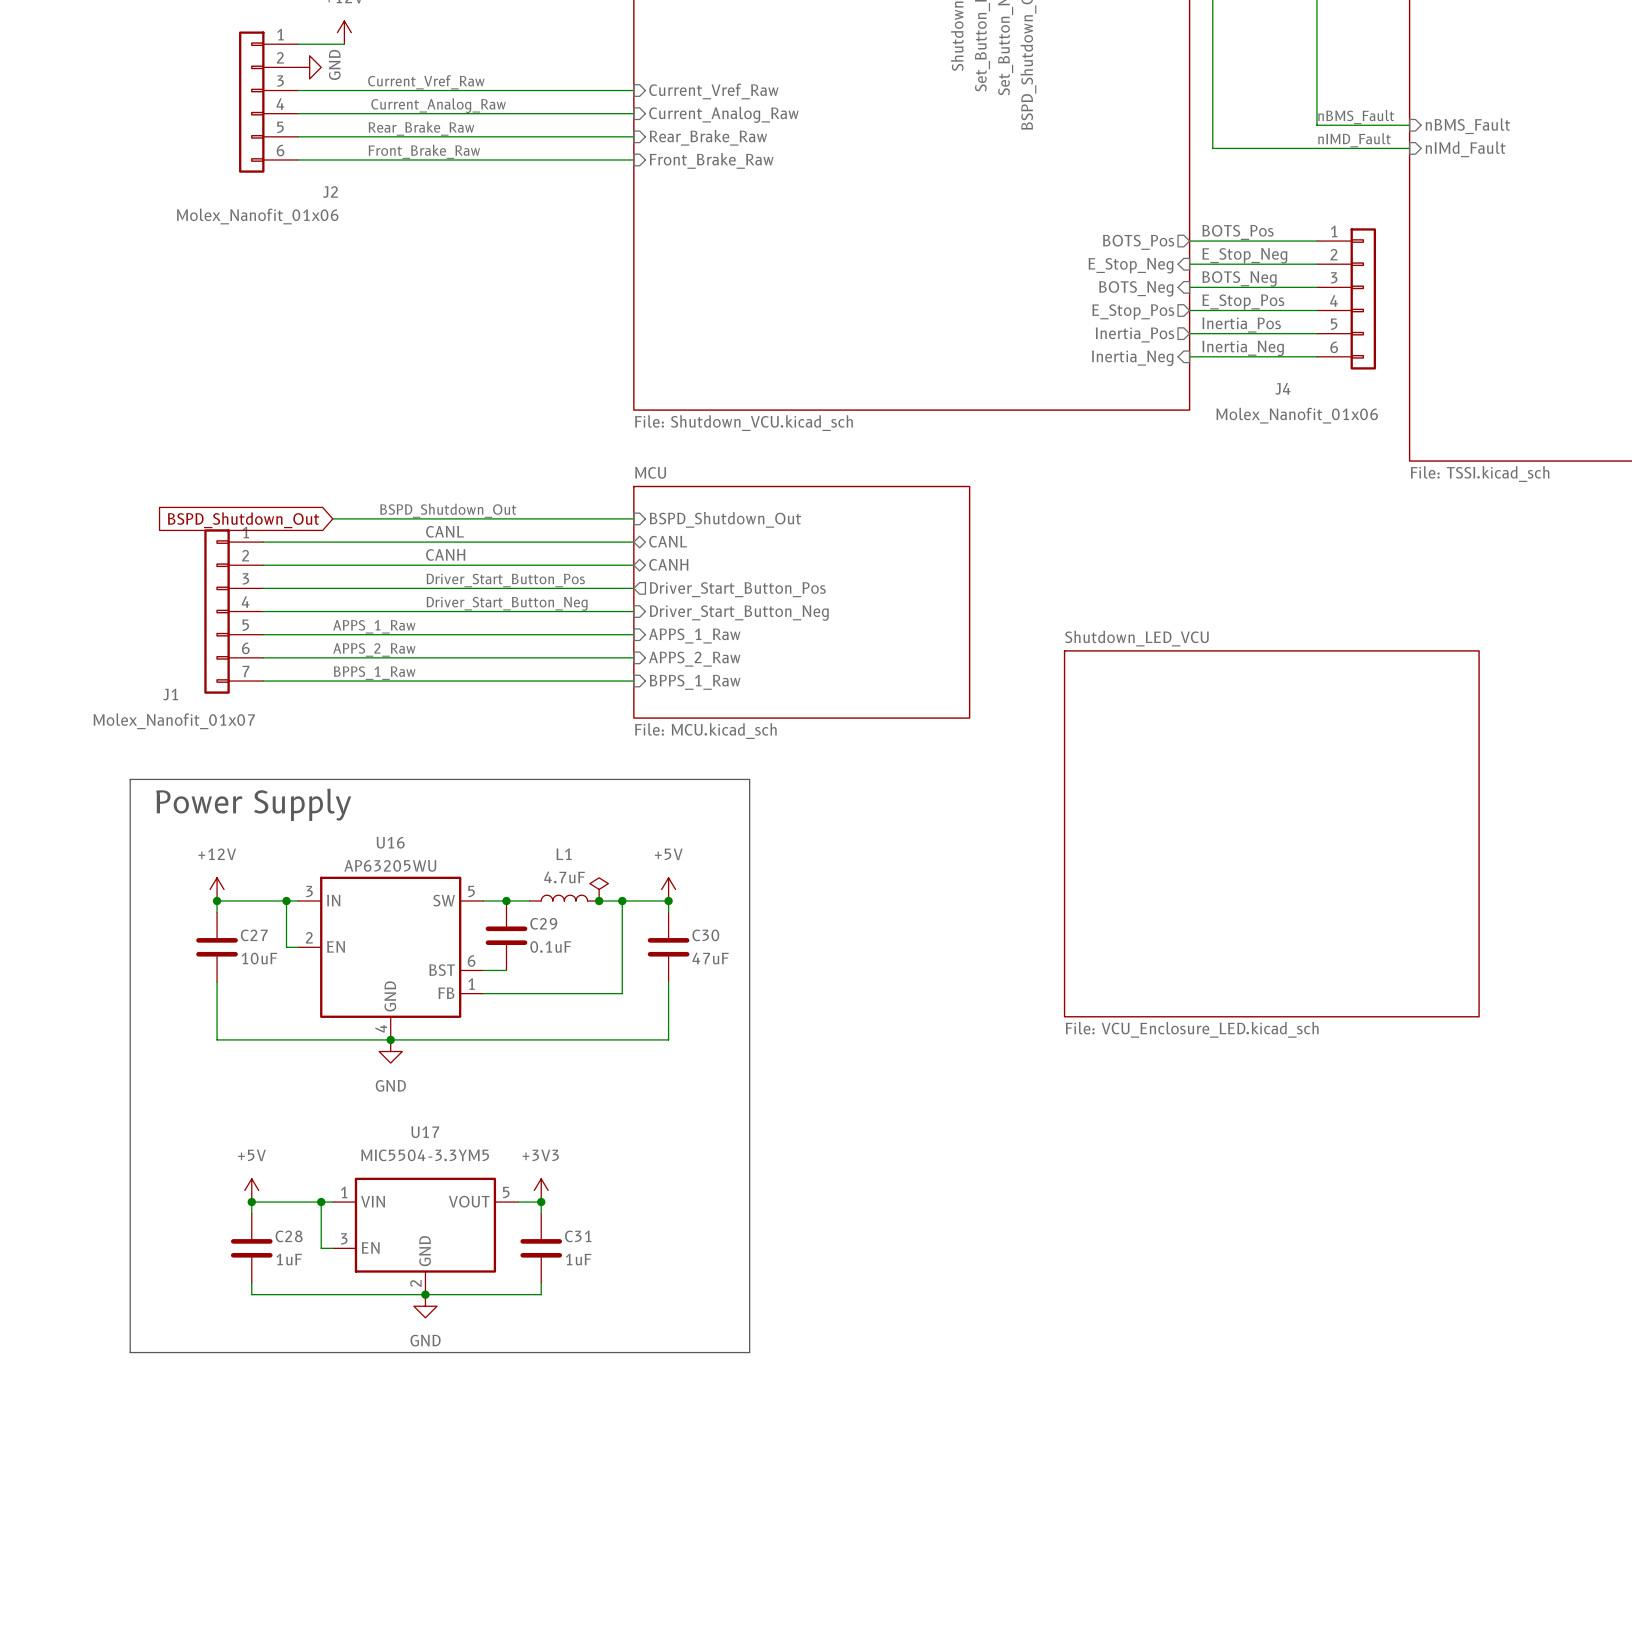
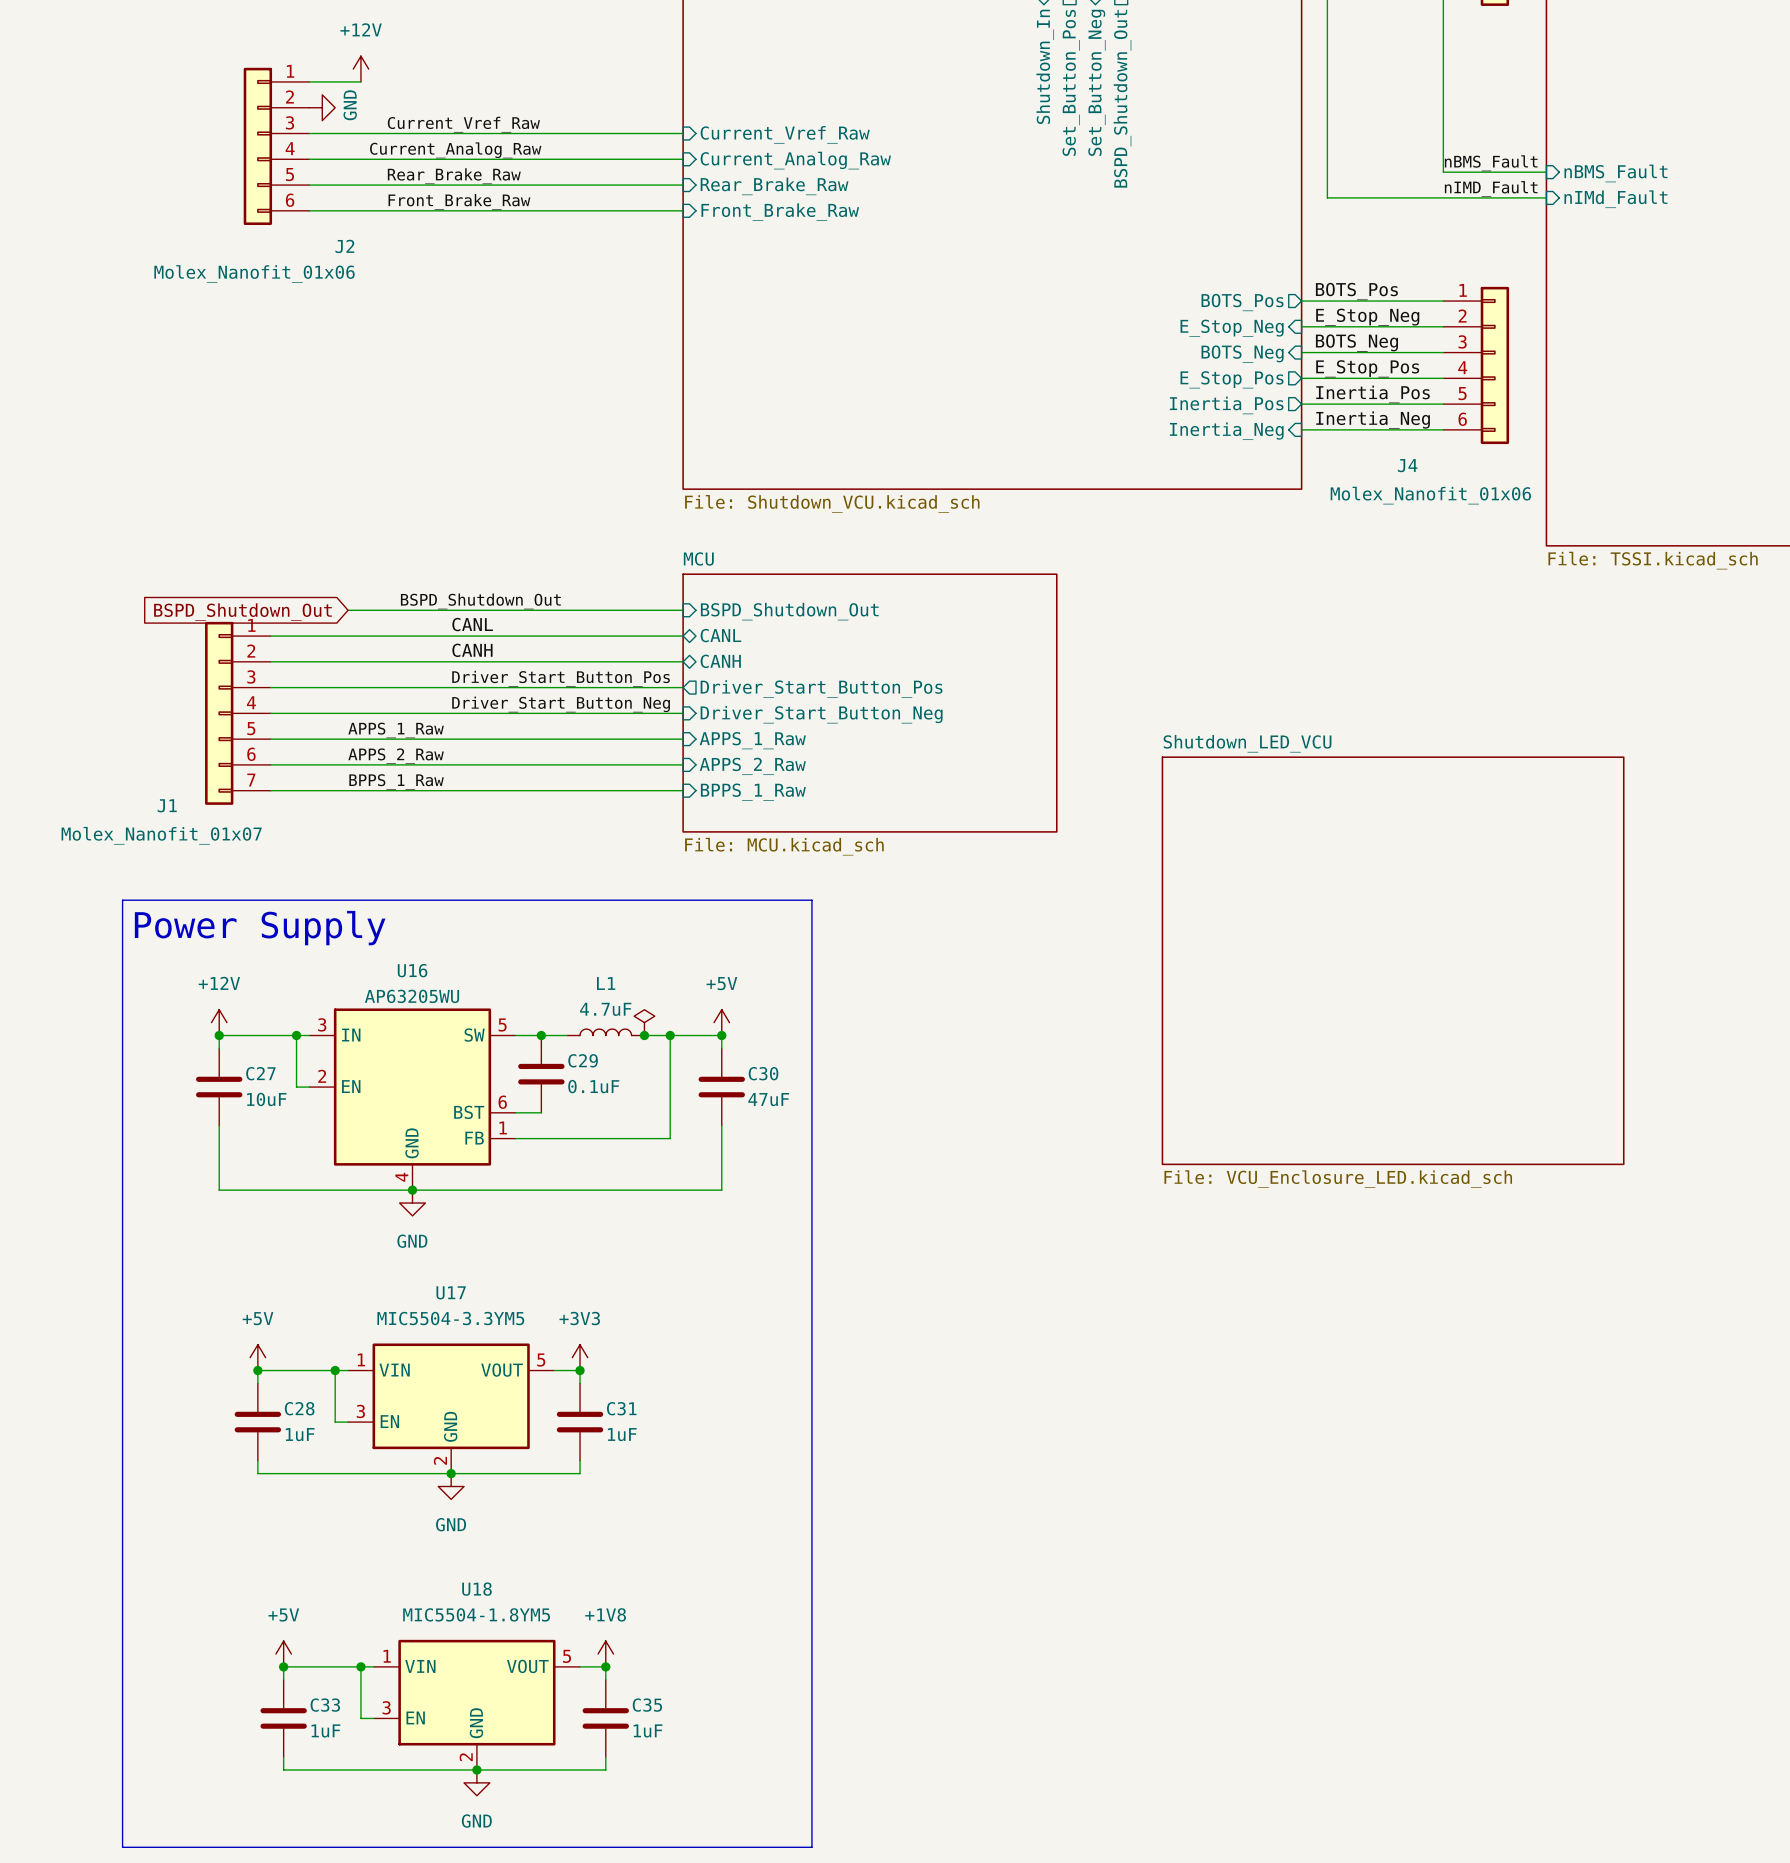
line: (130, 1352) (749, 1352) -> (122, 1538) (122, 1847) (811, 1847) (811, 1538)
power symbol: none -> +5V (283, 1654)
power symbol: none -> +1V8 (605, 1654)
junction: none -> (283, 1666)
wire: none -> (360, 1666) (360, 1718) (373, 1718)
junction: none -> (360, 1666)
wire: none -> (373, 1666) (283, 1666) (283, 1679)
wire: none -> (580, 1666) (605, 1666) (605, 1679)
junction: none -> (605, 1666)
U18: none -> MIC5504-1.8YM5 (476, 1704)
C33: none -> 1uF (283, 1718)
C35: none -> 1uF (605, 1718)
wire: none -> (283, 1757) (283, 1769) (605, 1769) (605, 1757)
junction: none -> (476, 1769)
power symbol: none -> GND (476, 1782)

